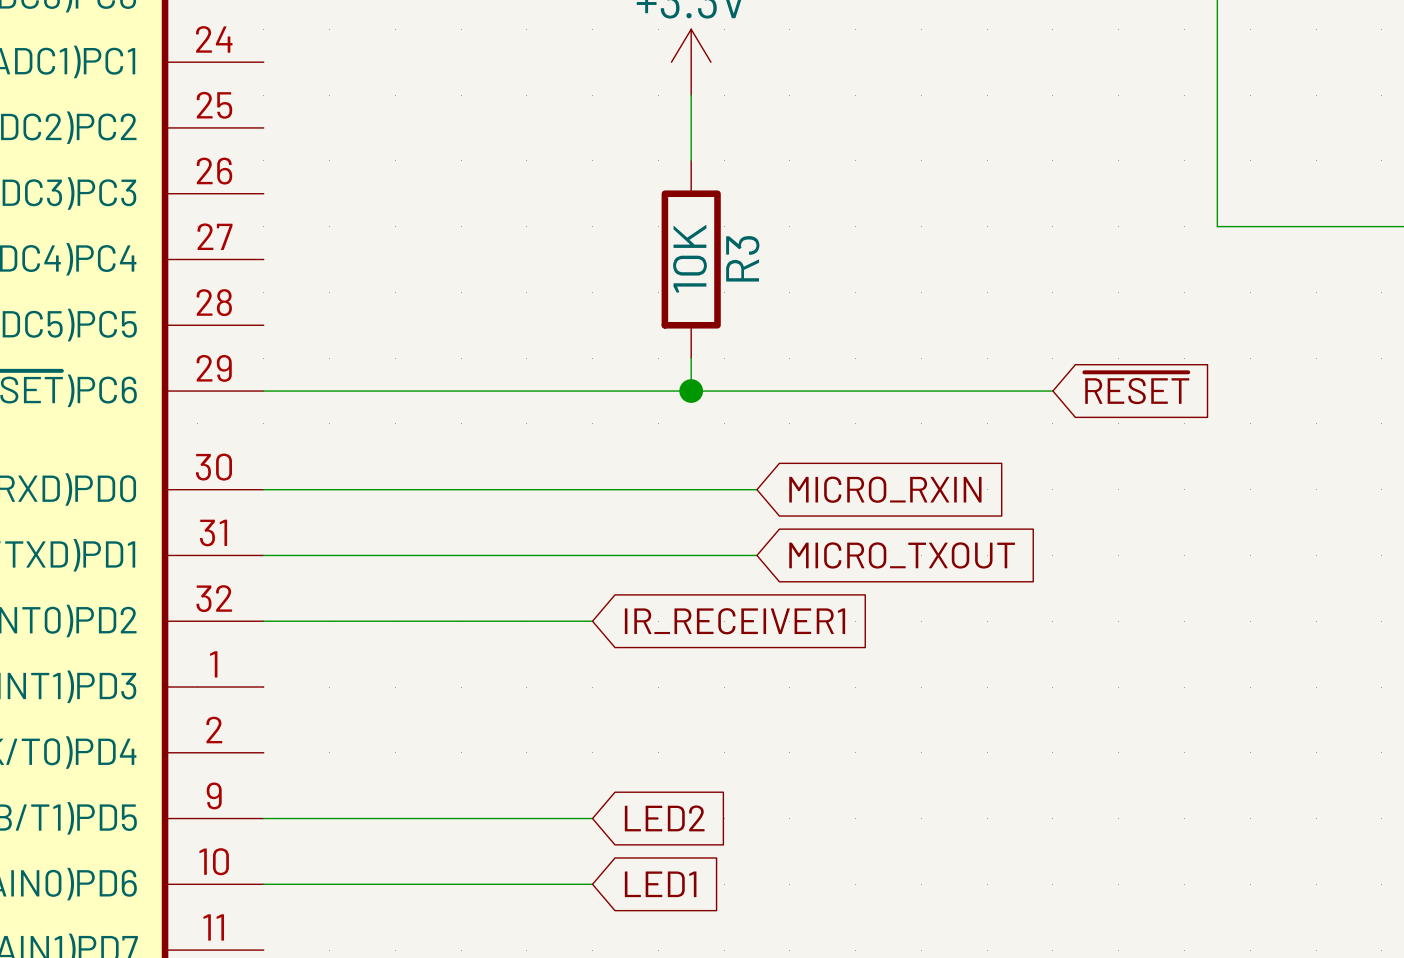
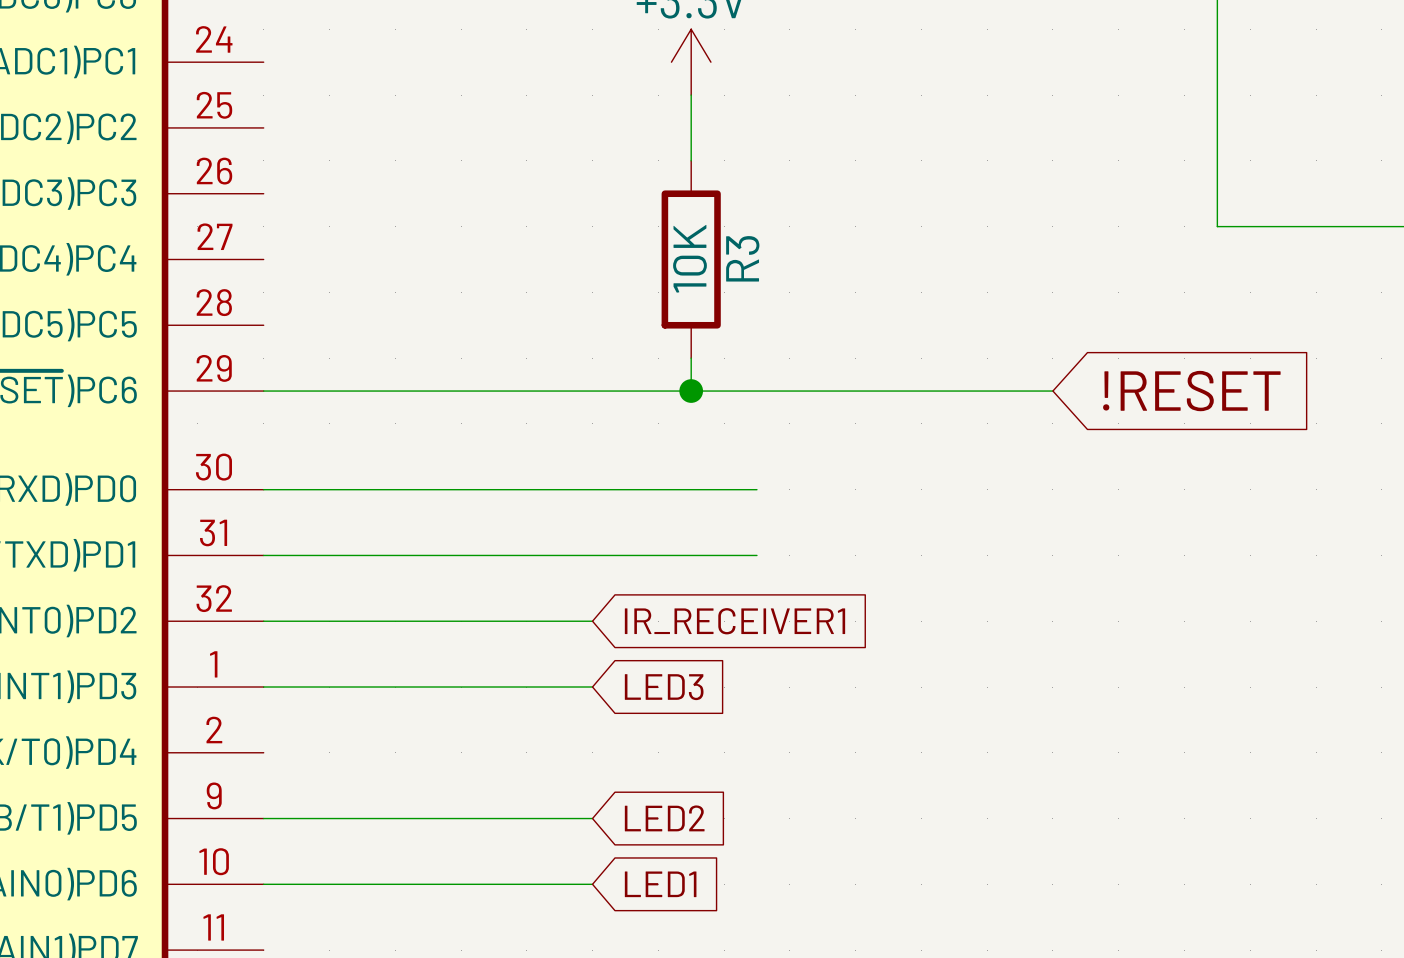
global label: ~{RESET} (1136, 388) -> !RESET (1191, 391)
global label: MICRO_RXIN (885, 489) -> none
global label: MICRO_TXOUT (902, 555) -> none
wire: none -> (263, 687) (592, 687)
global label: none -> LED3 (664, 687)

